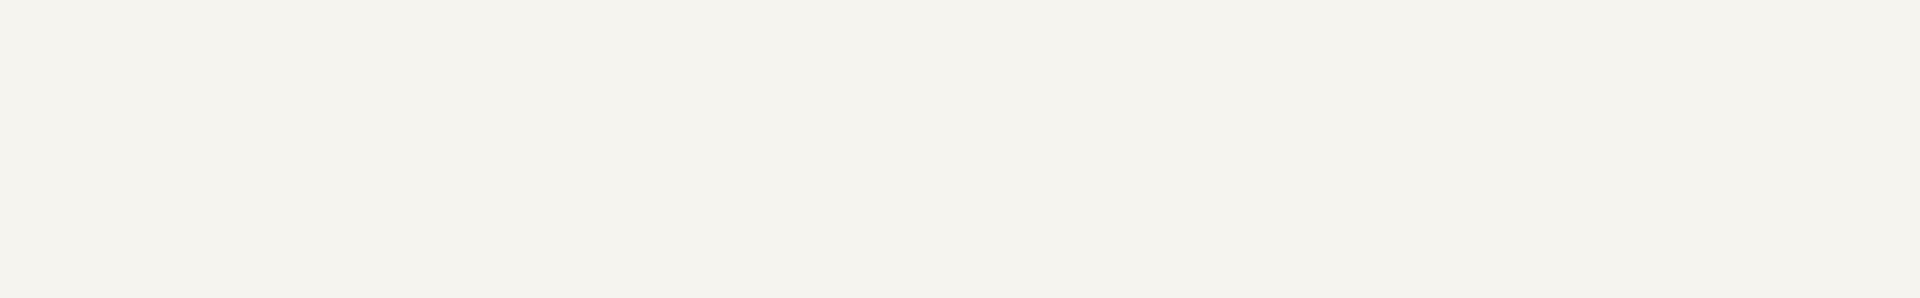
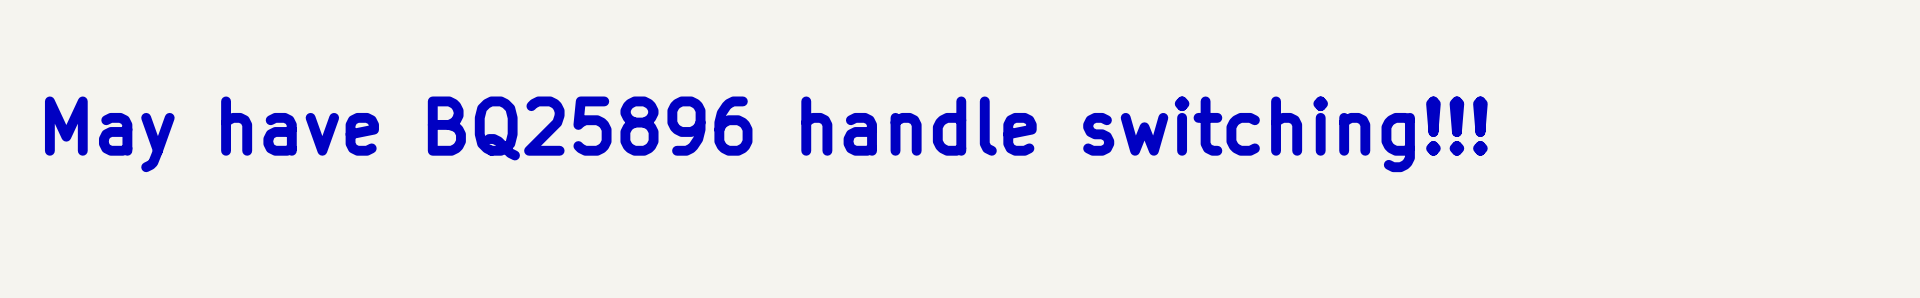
text: none -> May have BQ25896 handle switching!!! (766, 134)

